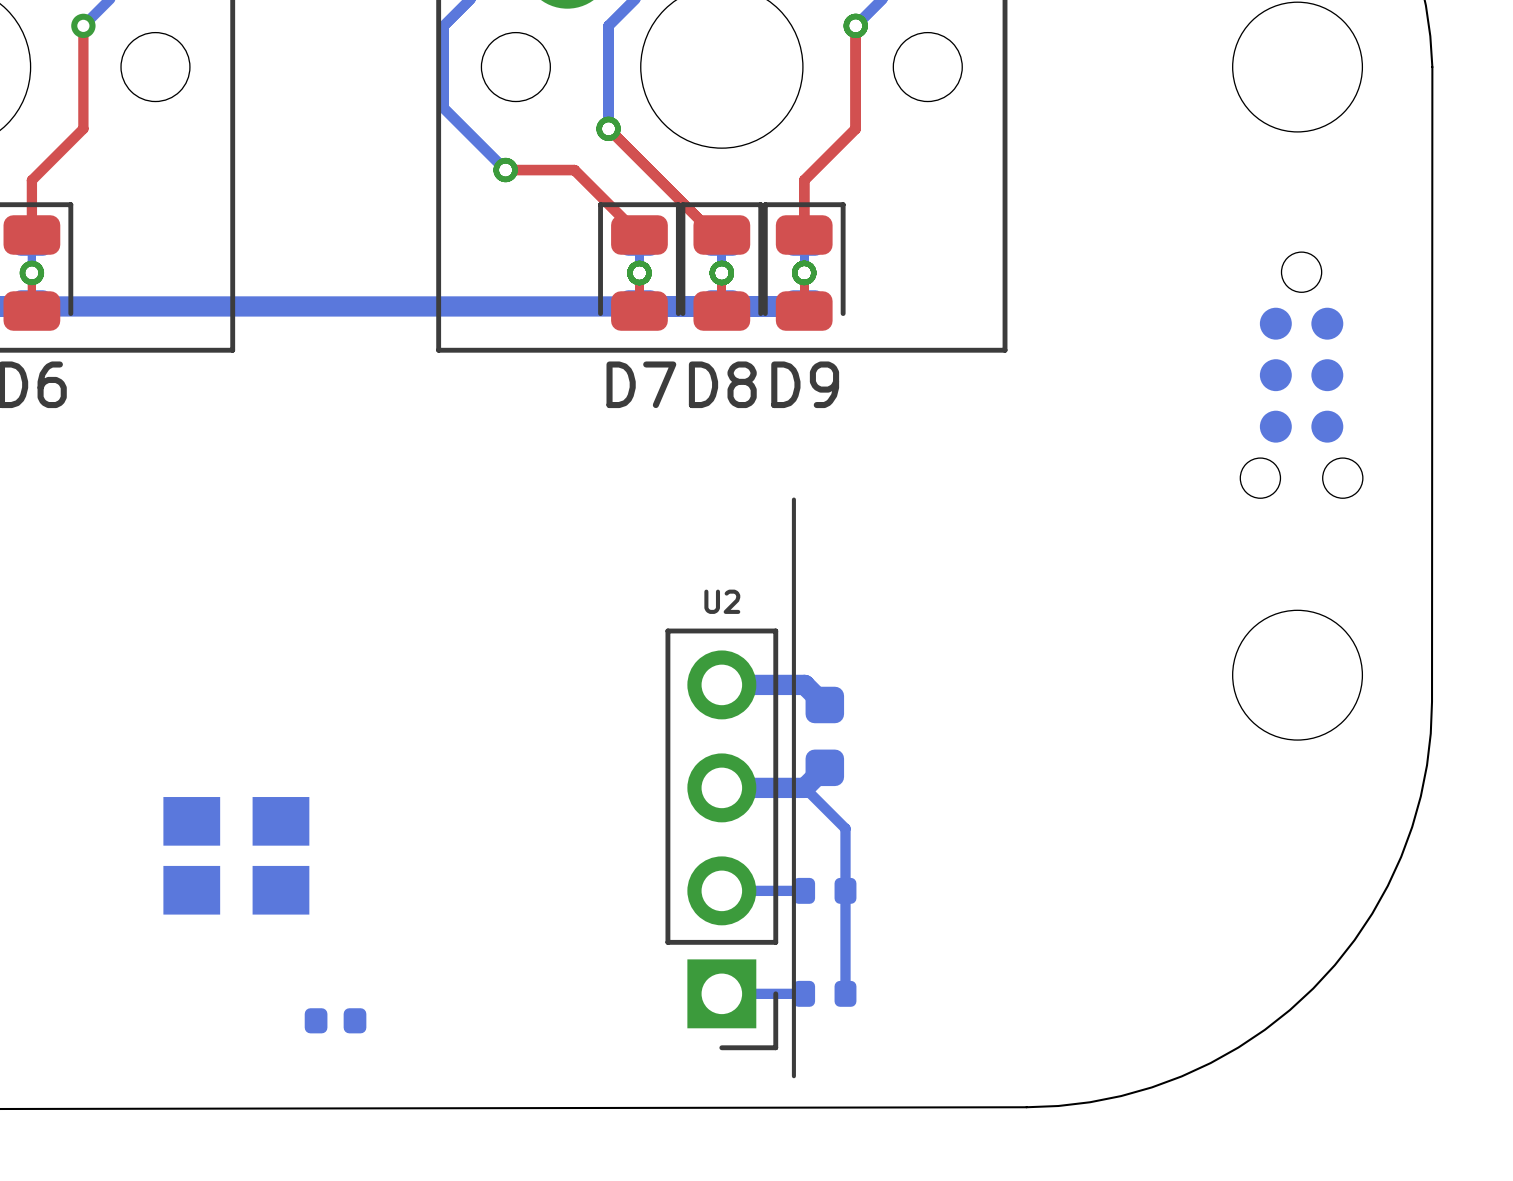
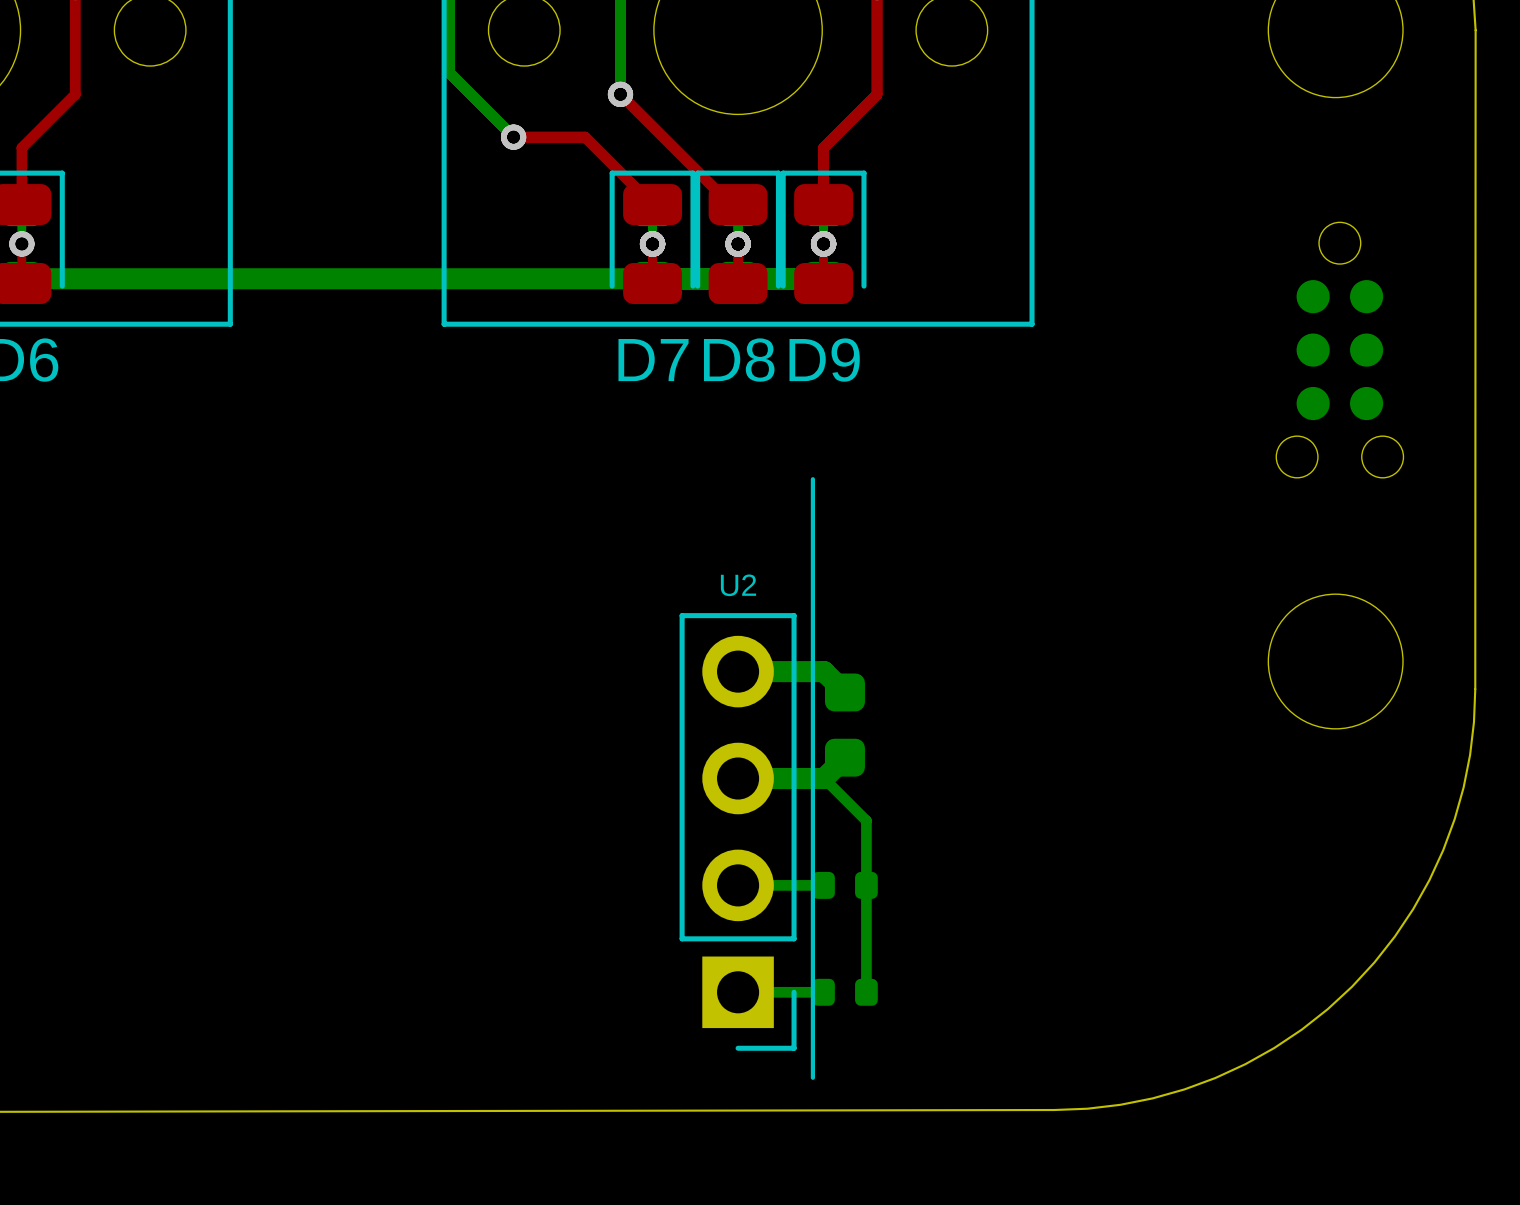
part: (236, 855) -> none
part: (335, 1020) -> none

